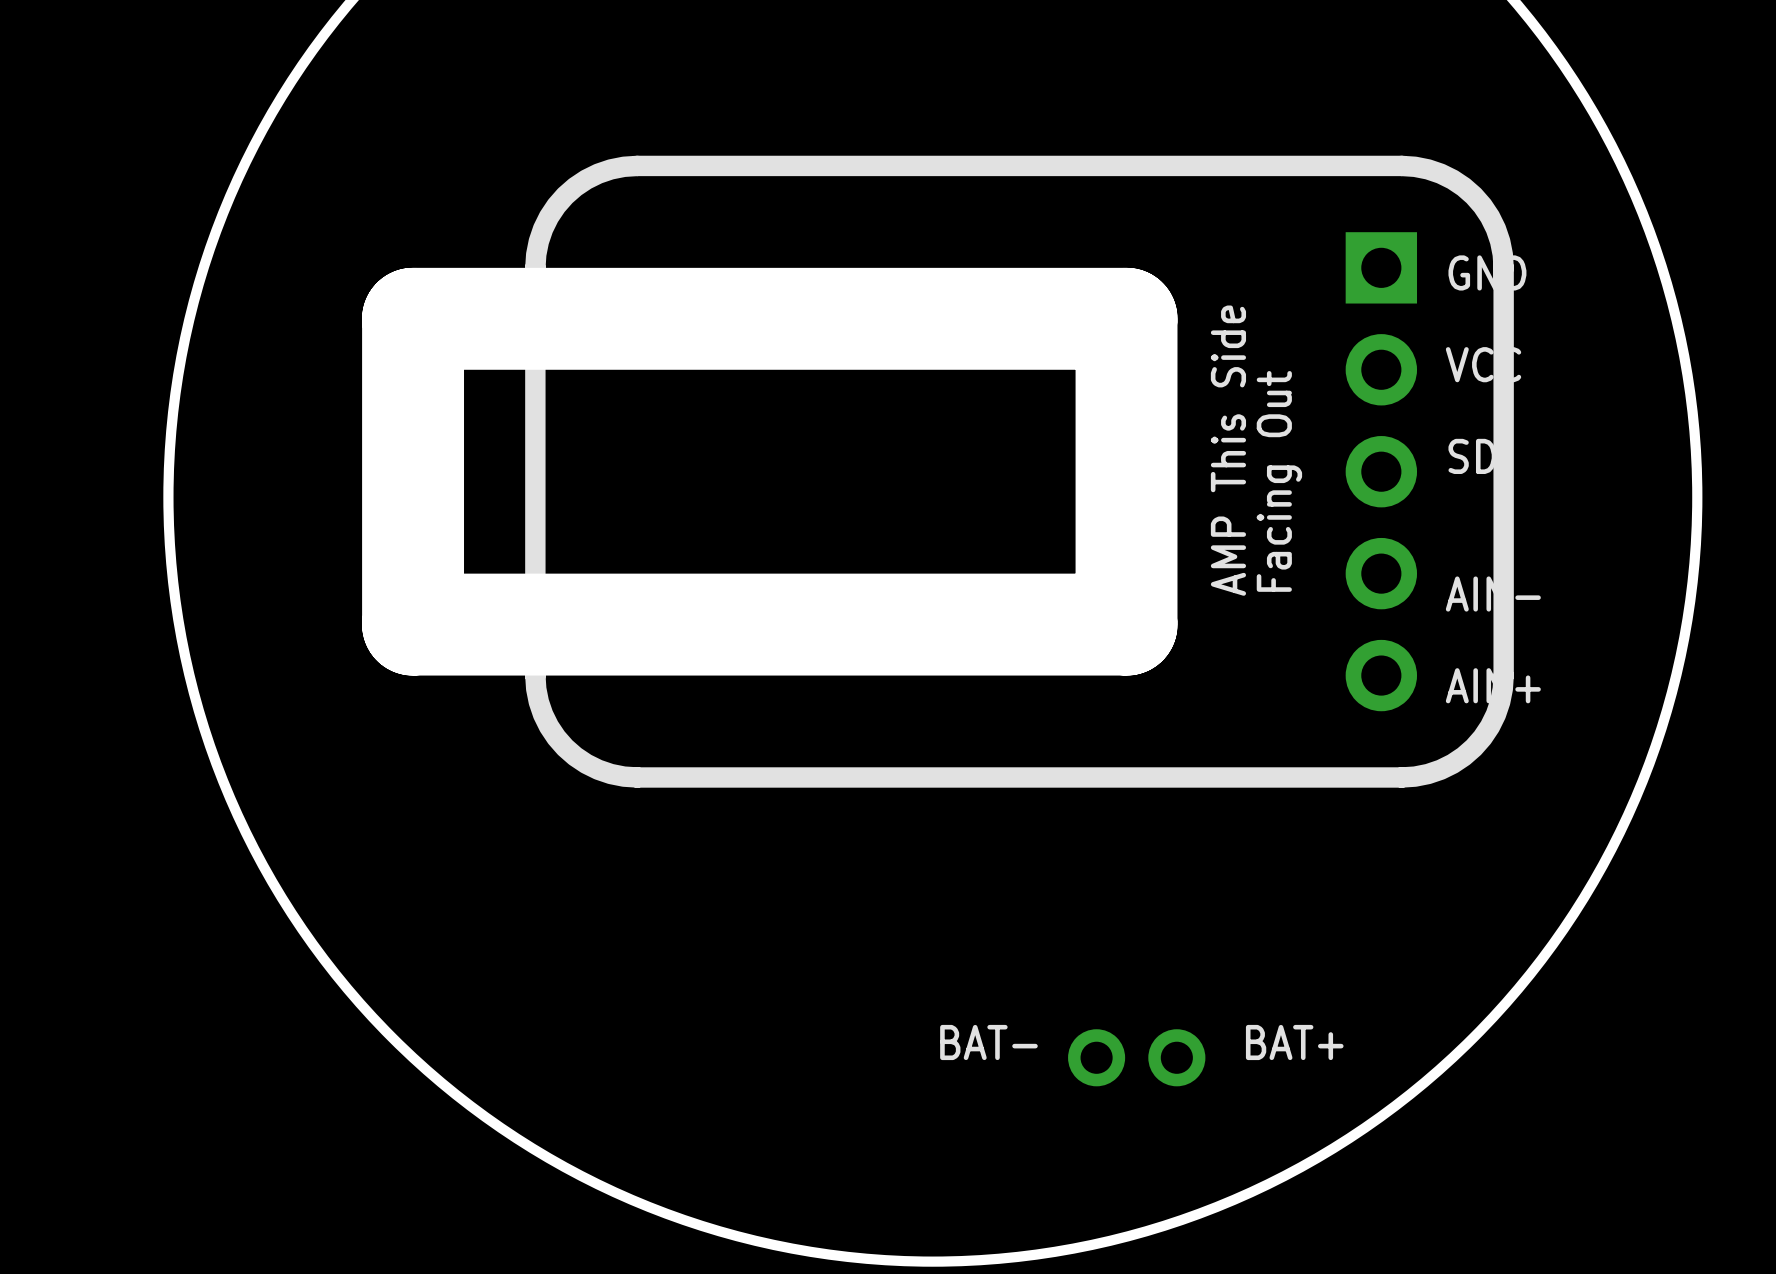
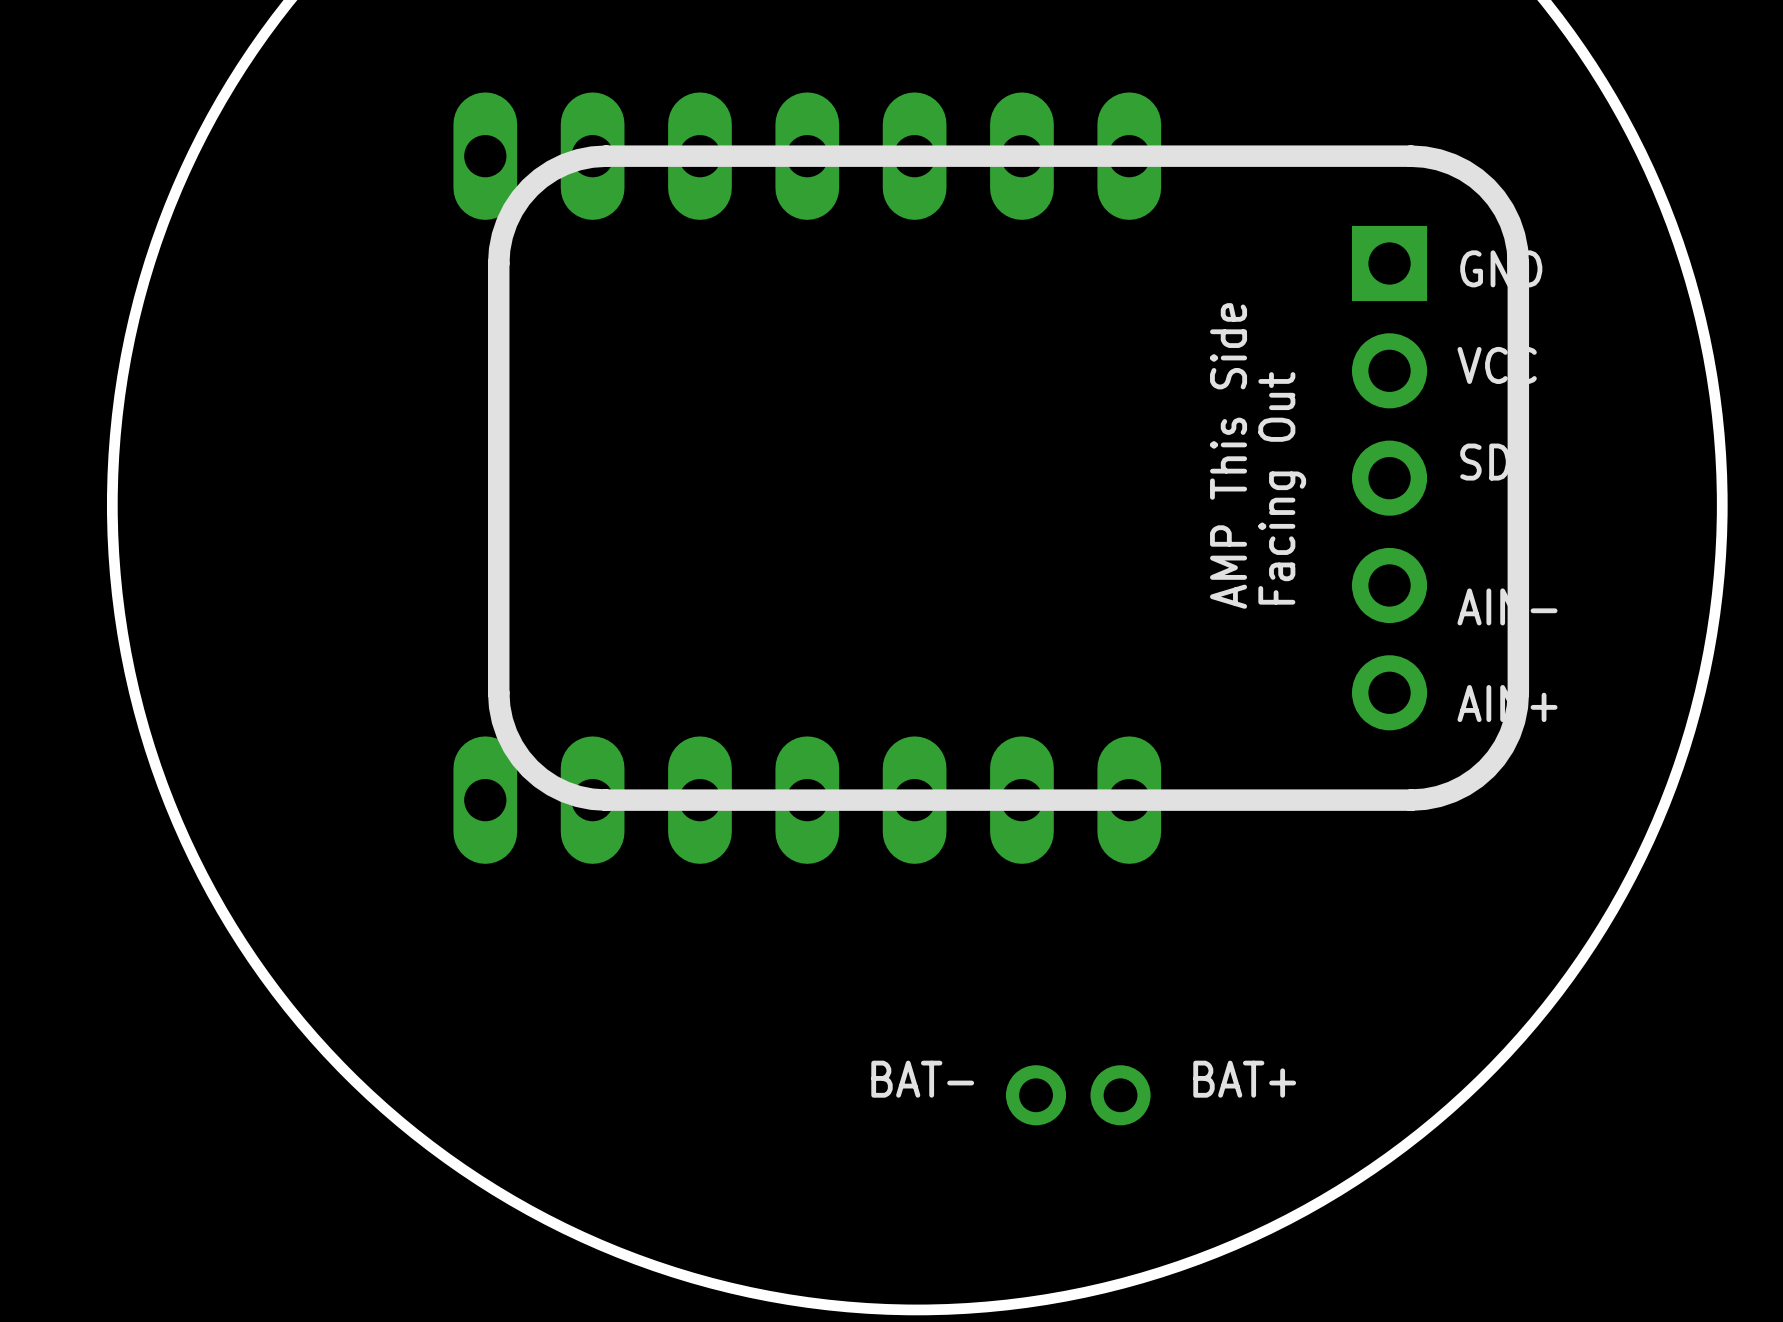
part: none -> (807, 156)
board edge: (1126, 318) (1126, 624) (413, 624) (413, 318) (1126, 318) -> none
part: none -> (807, 800)
text position: BAT- (988, 1042) -> BAT- (922, 1079)
text position: BAT+ (1294, 1042) -> BAT+ (1244, 1079)
part position: (1136, 1057) -> (1078, 1095)

